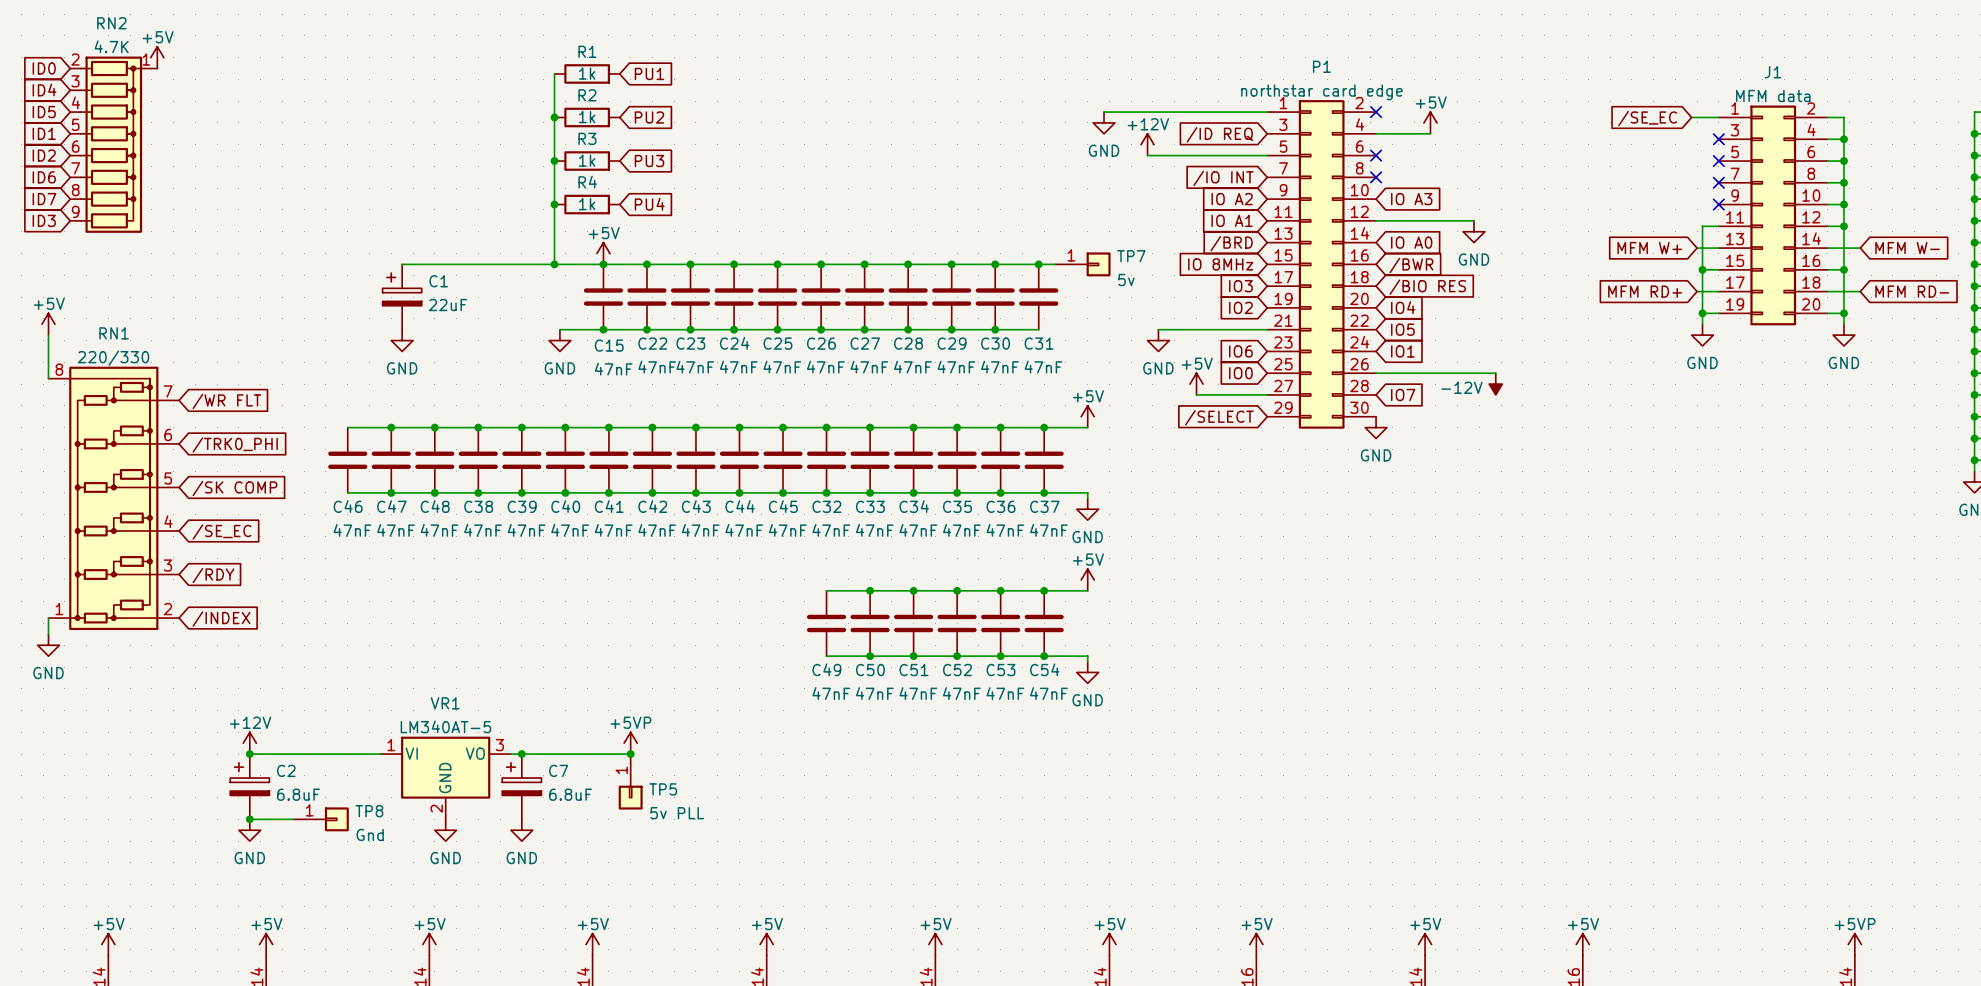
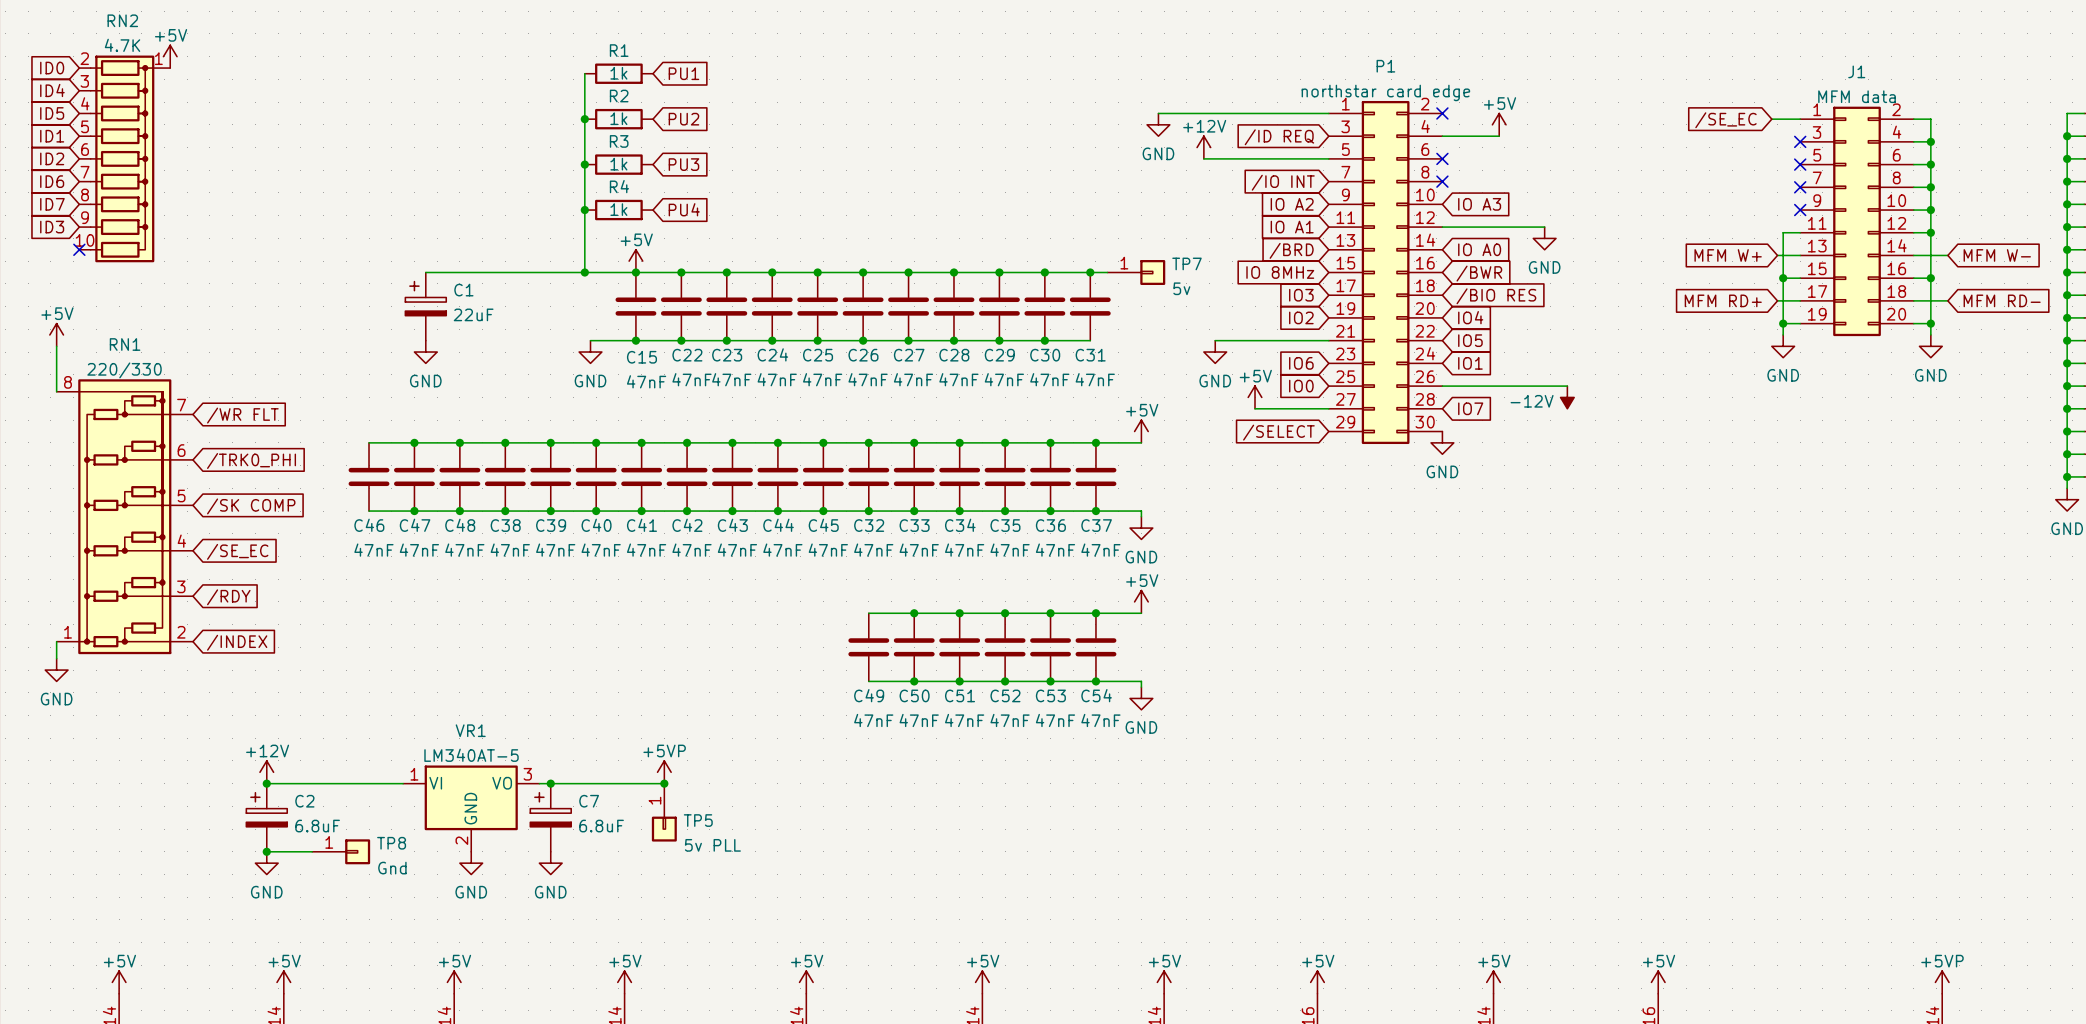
RN2 symbol: [70, 56, 158, 233] -> [79, 55, 171, 263]
no-connect mark: none -> (79, 249)

